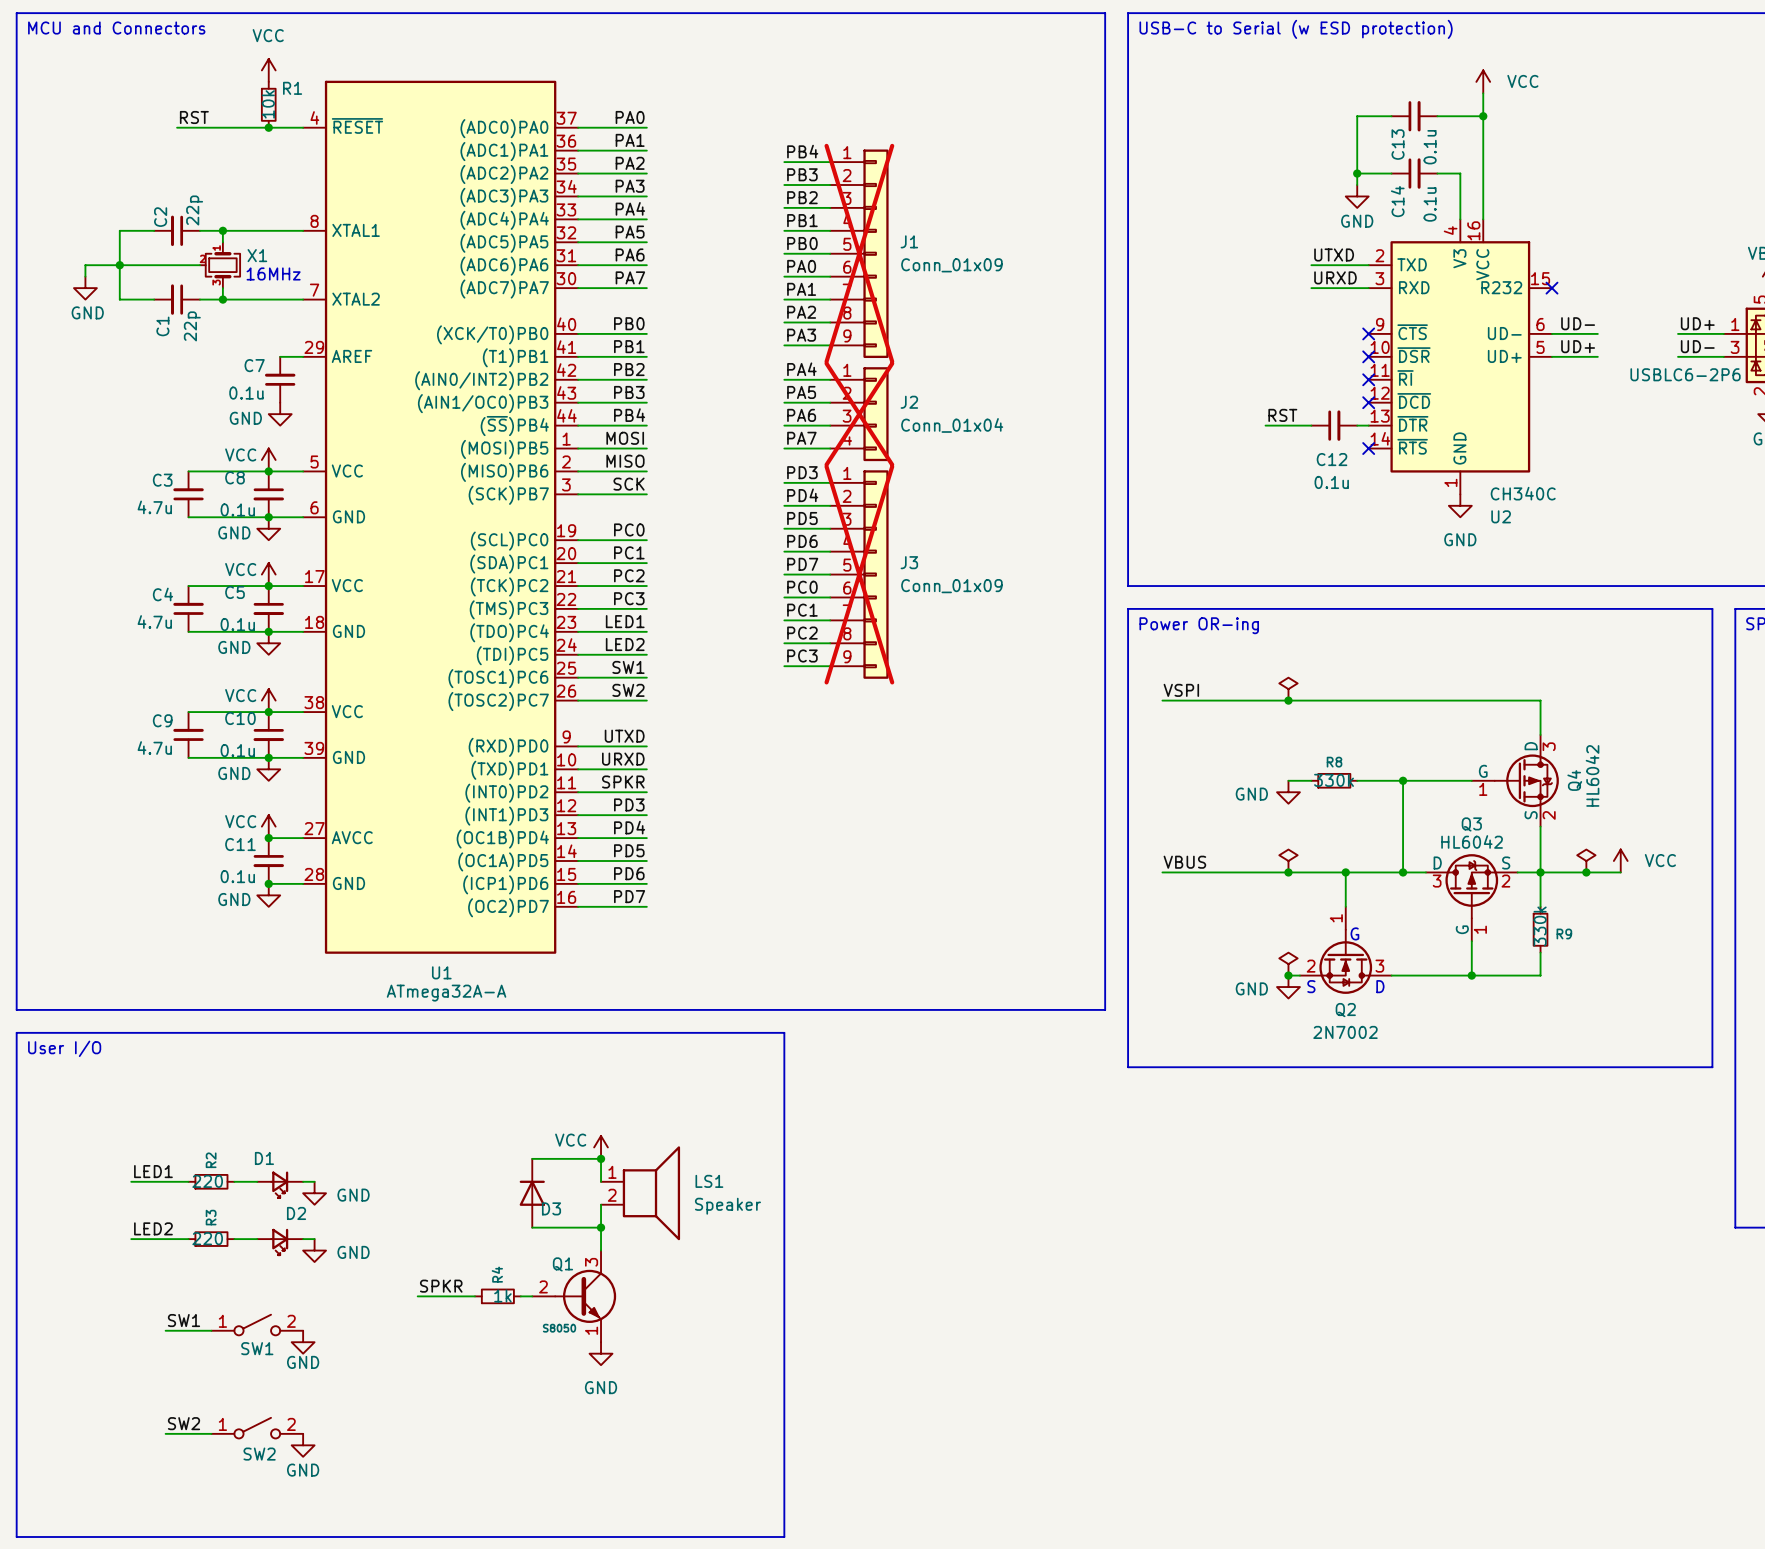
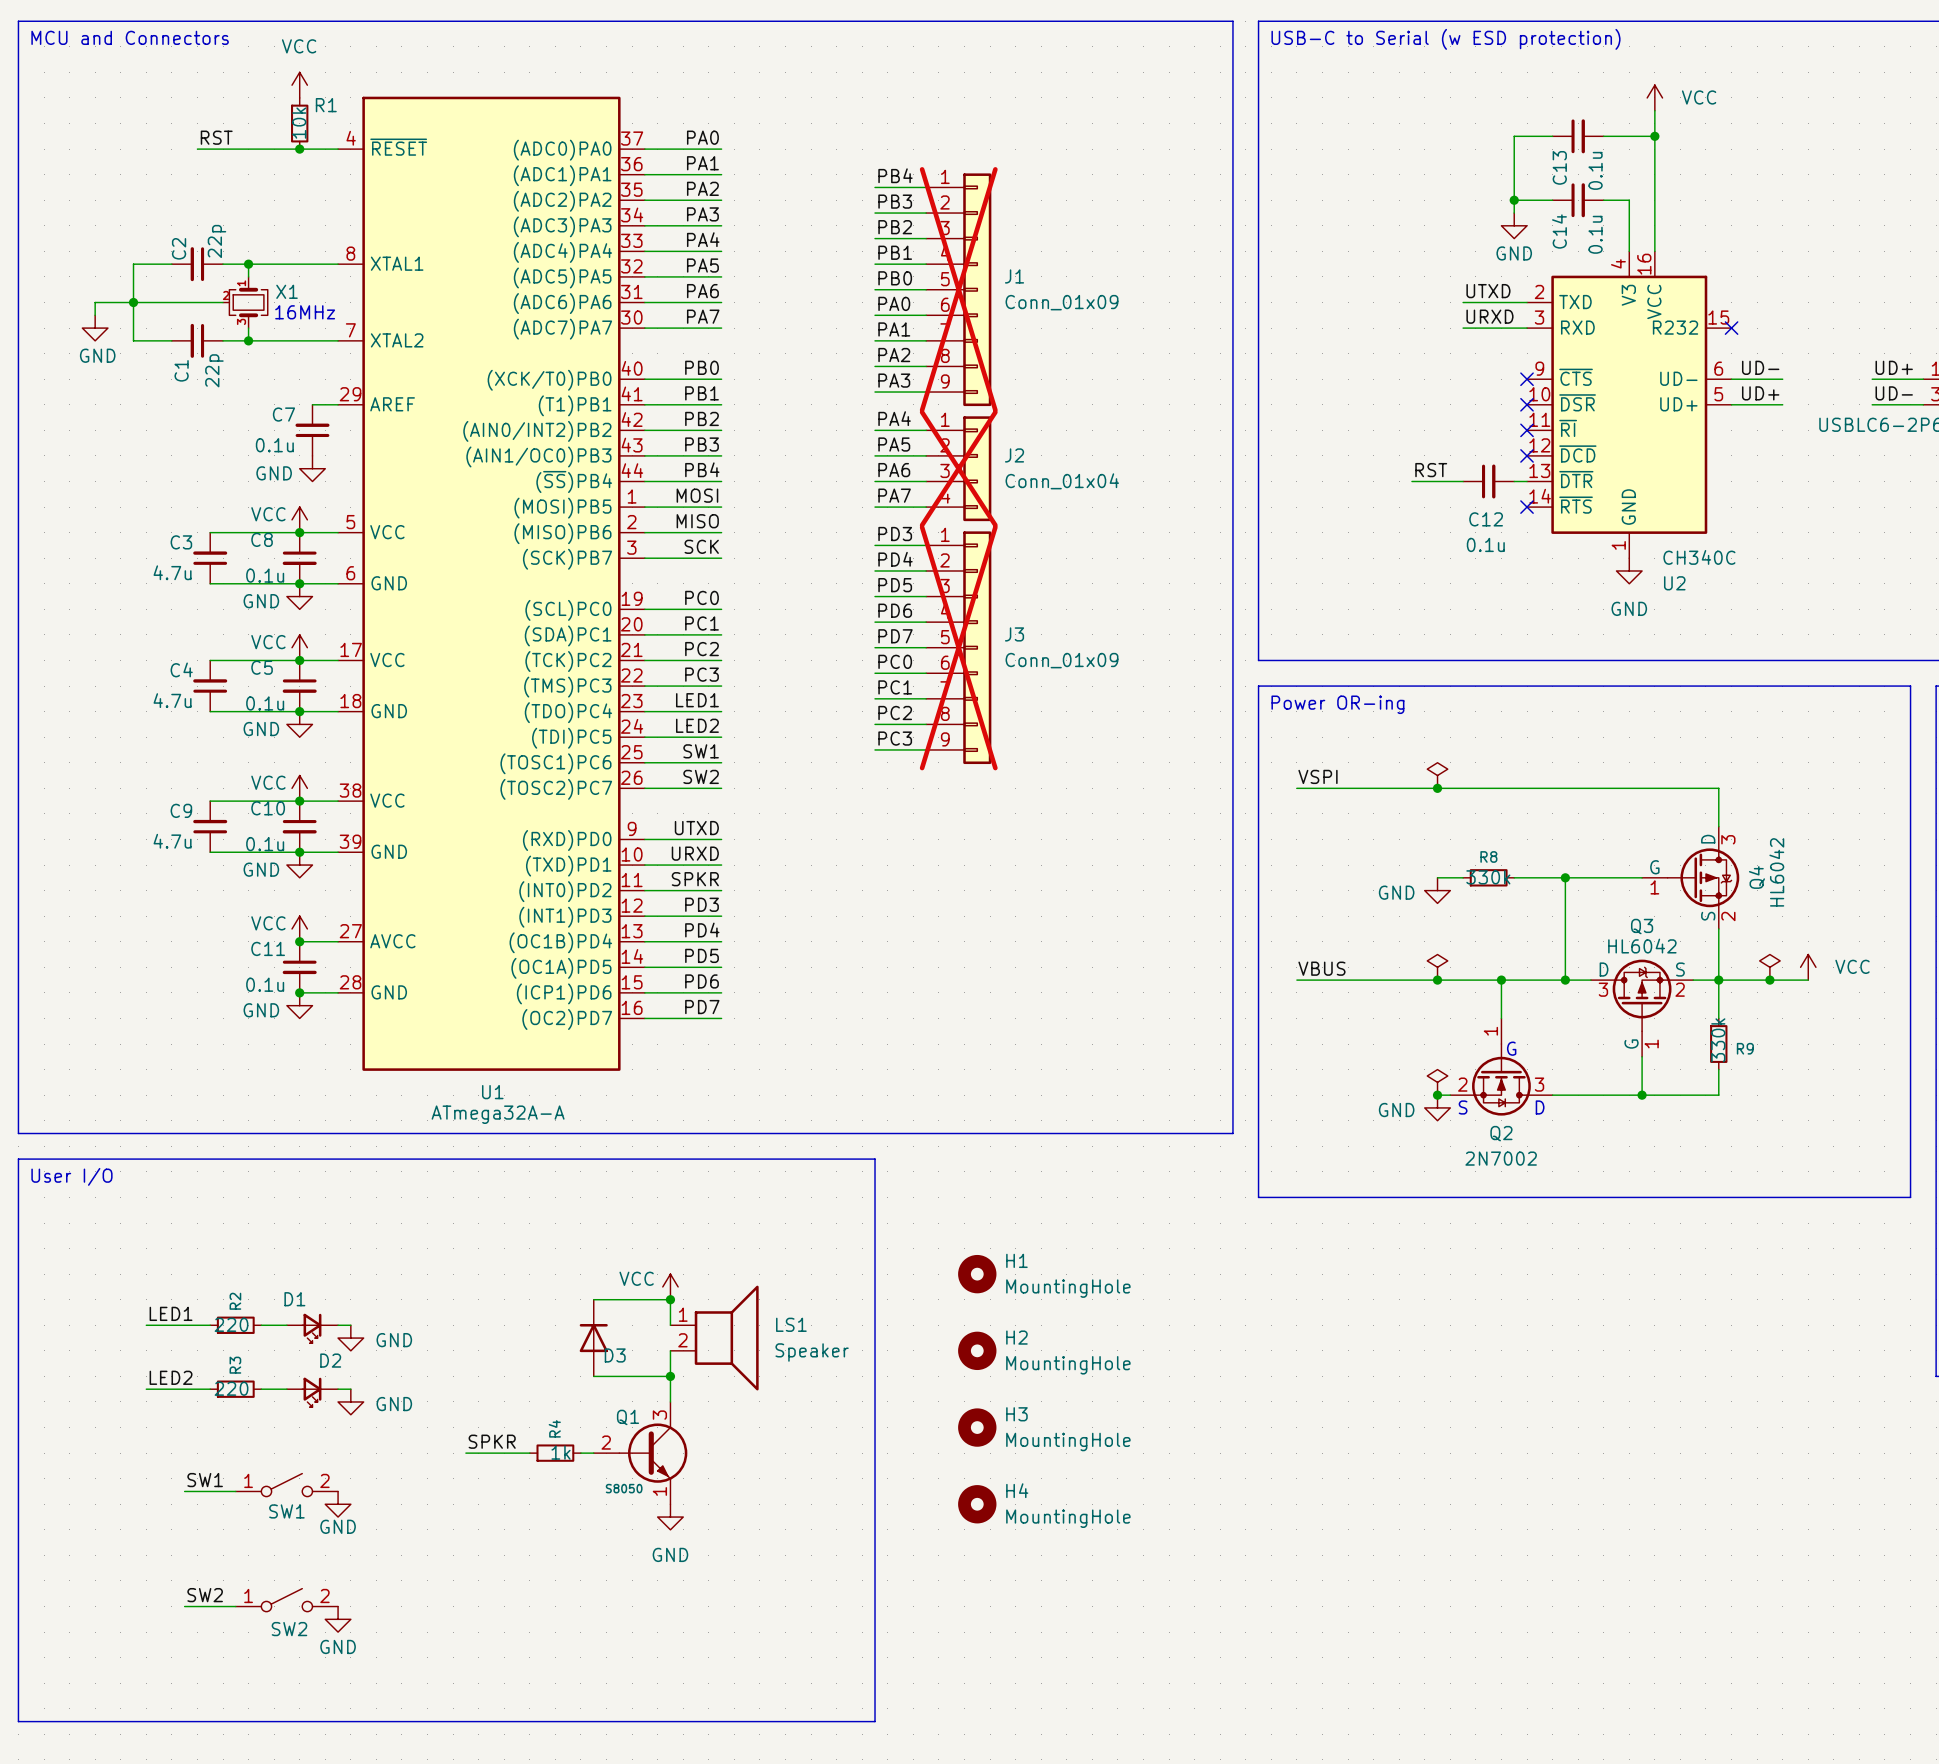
H1: none -> MountingHole (977, 1274)
H2: none -> MountingHole (977, 1350)
H3: none -> MountingHole (977, 1427)
H4: none -> MountingHole (977, 1504)

